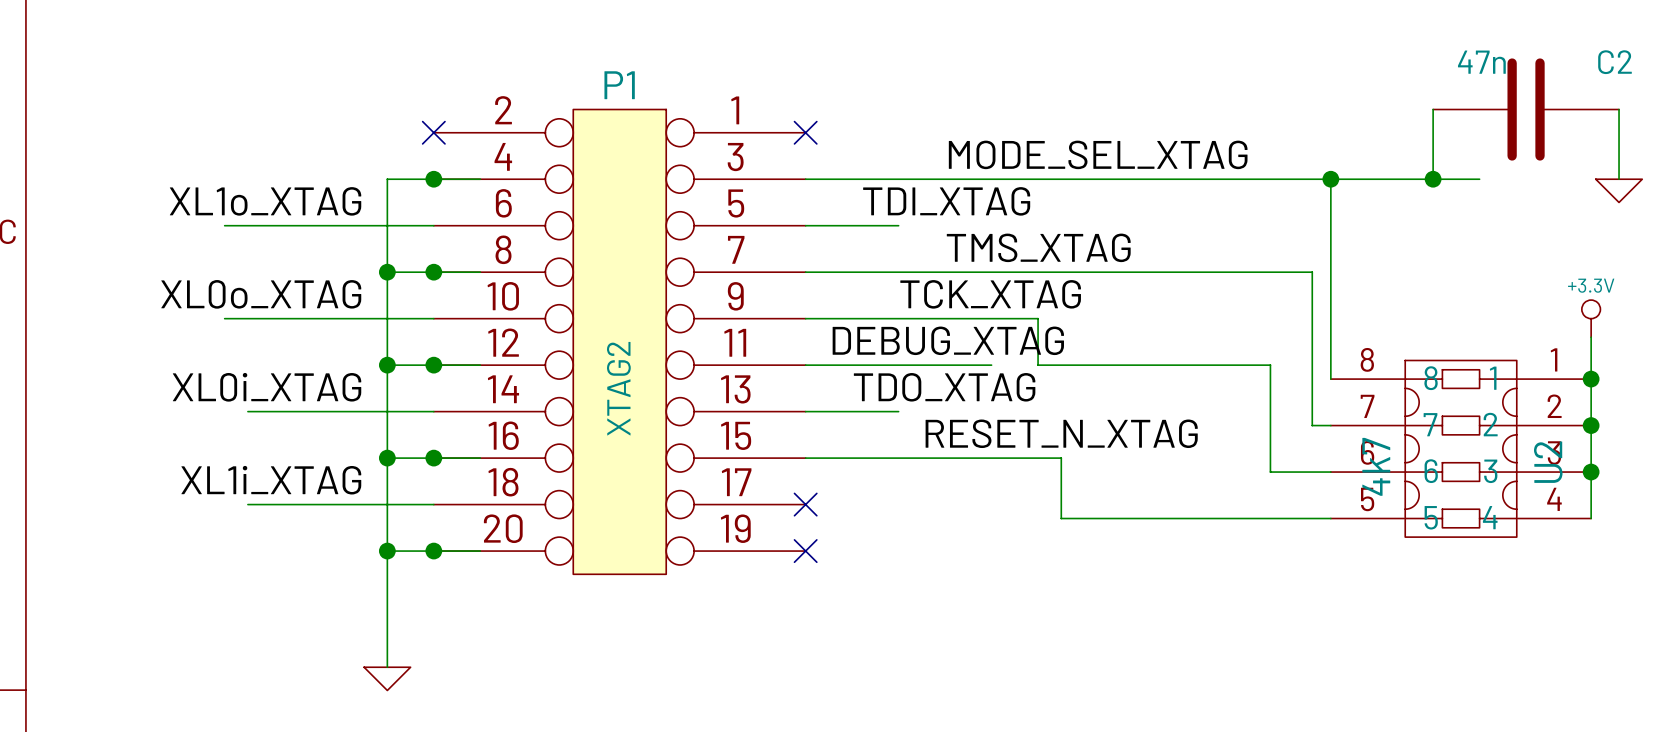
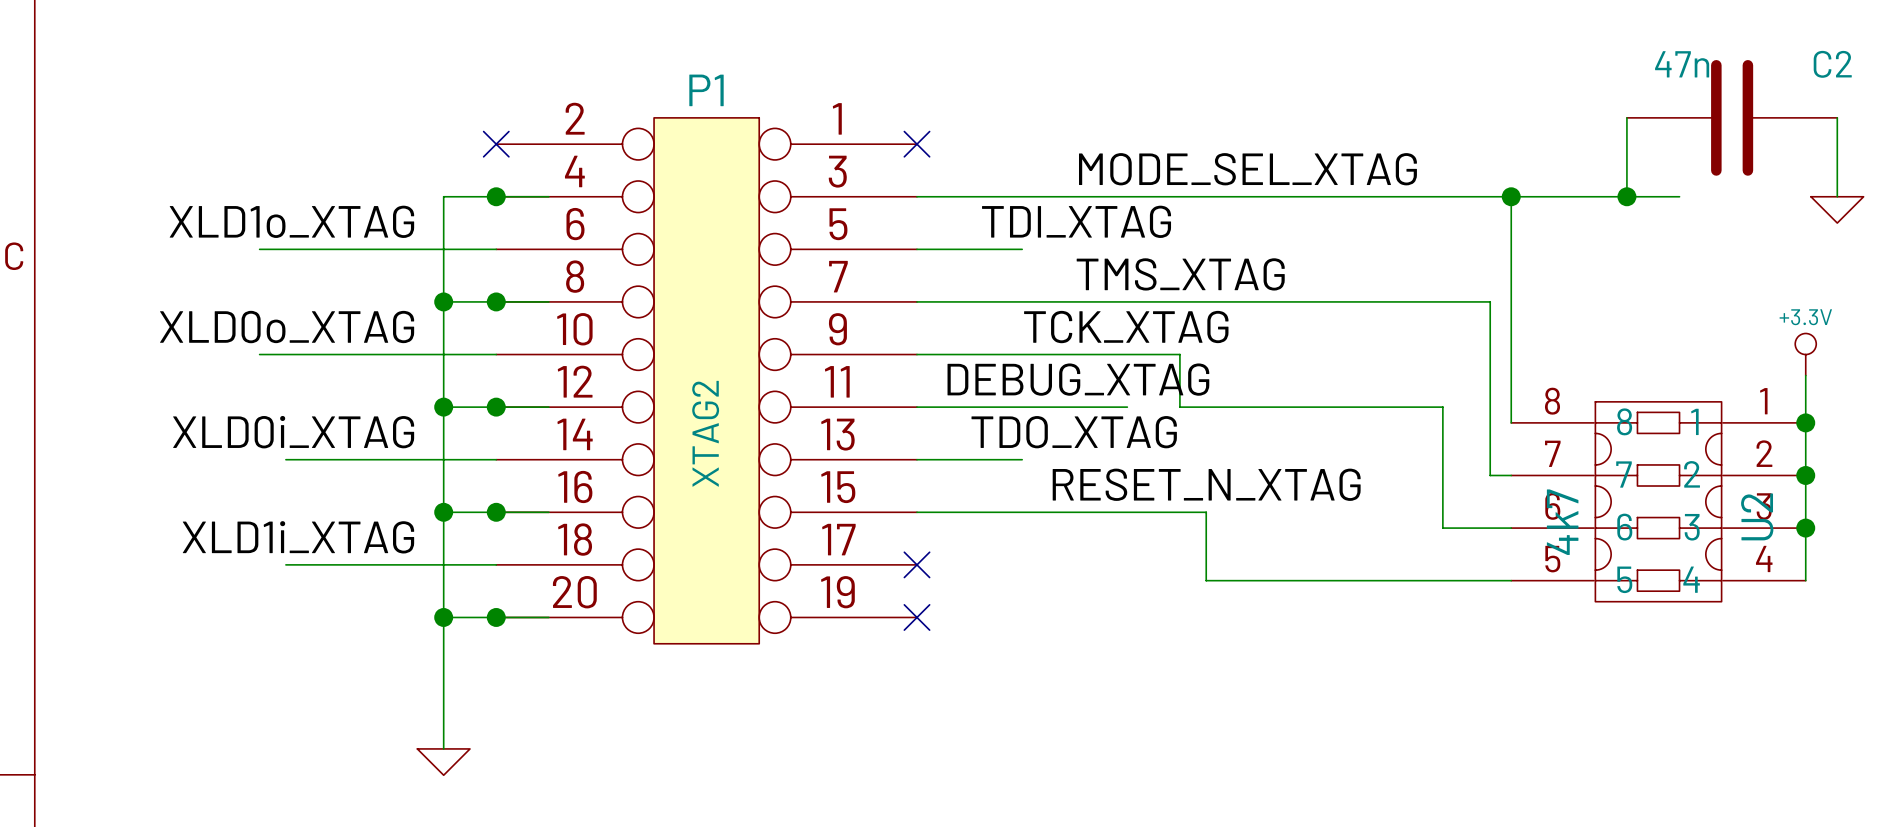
label: XL1o_XTAG (265, 201) -> XLD1o_XTAG (291, 221)
label: XL0o_XTAG (261, 294) -> XLD0o_XTAG (287, 327)
label: XL0i_XTAG (267, 387) -> XLD0i_XTAG (293, 432)
label: XL1i_XTAG (271, 480) -> XLD1i_XTAG (298, 537)

